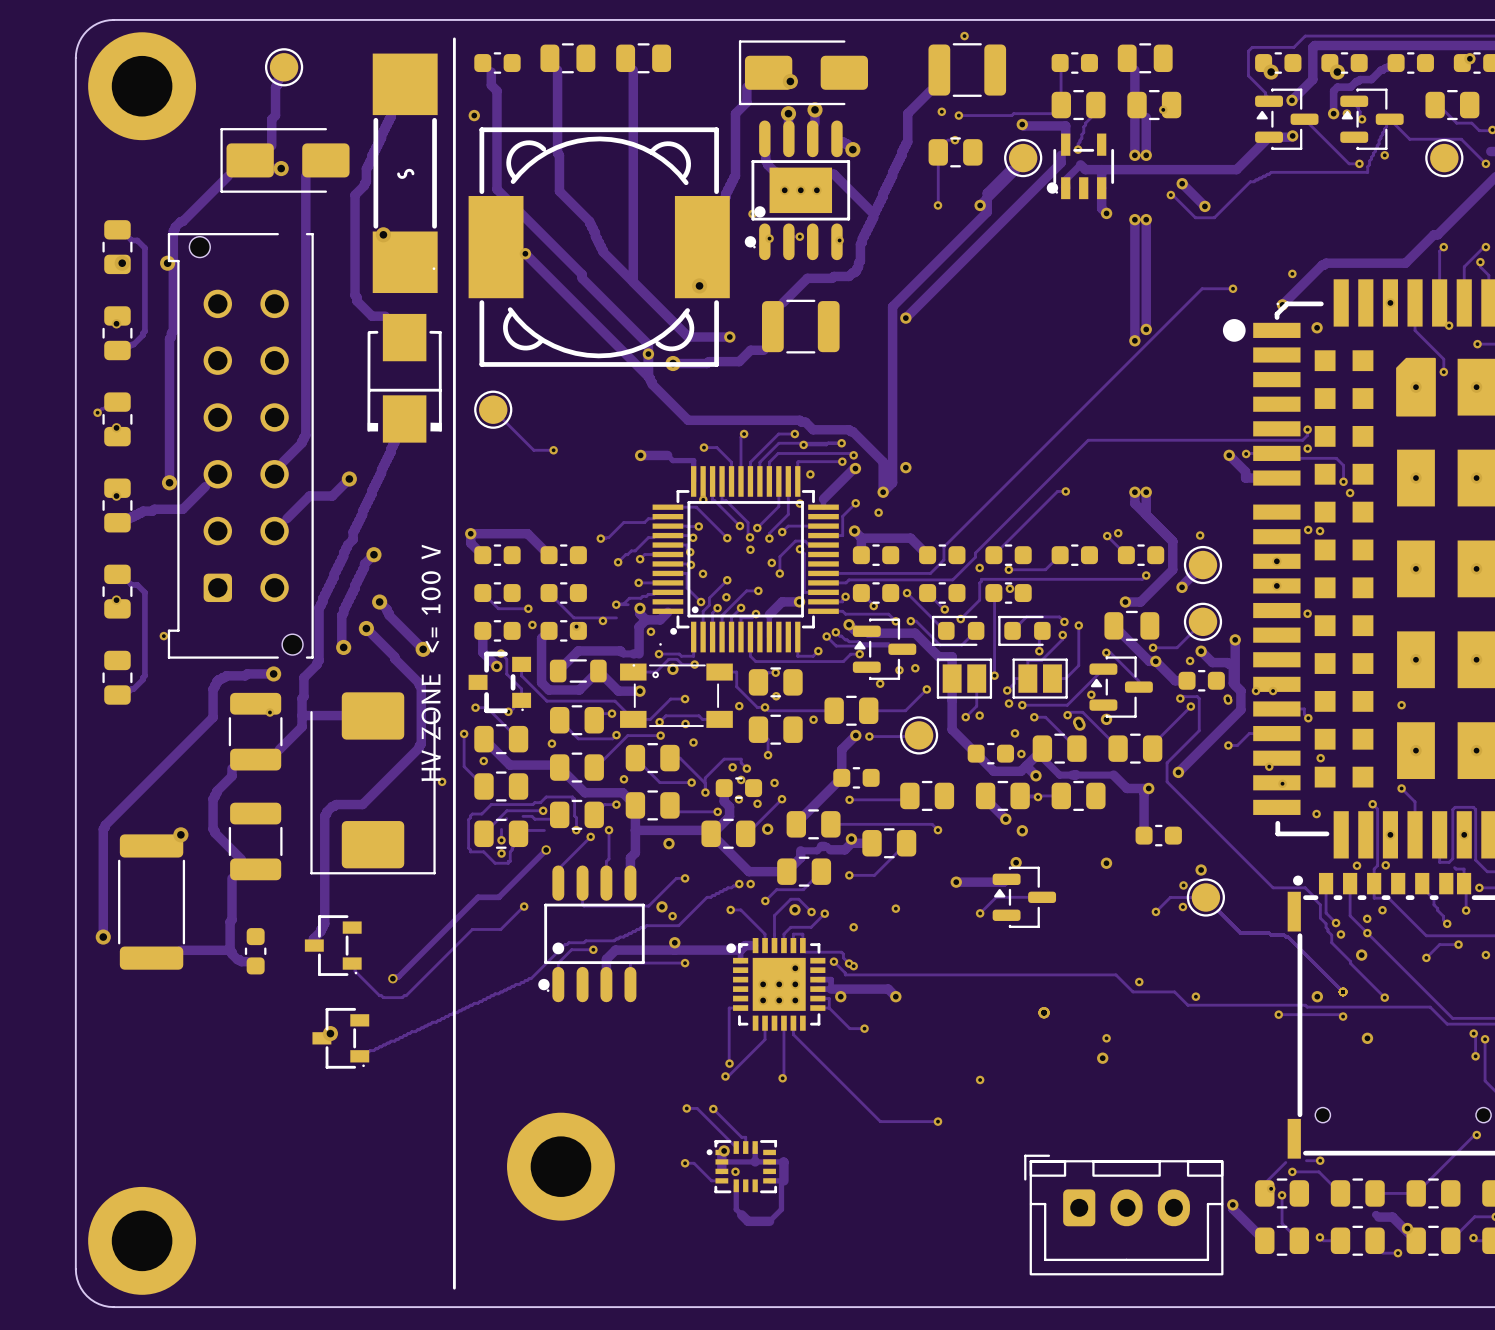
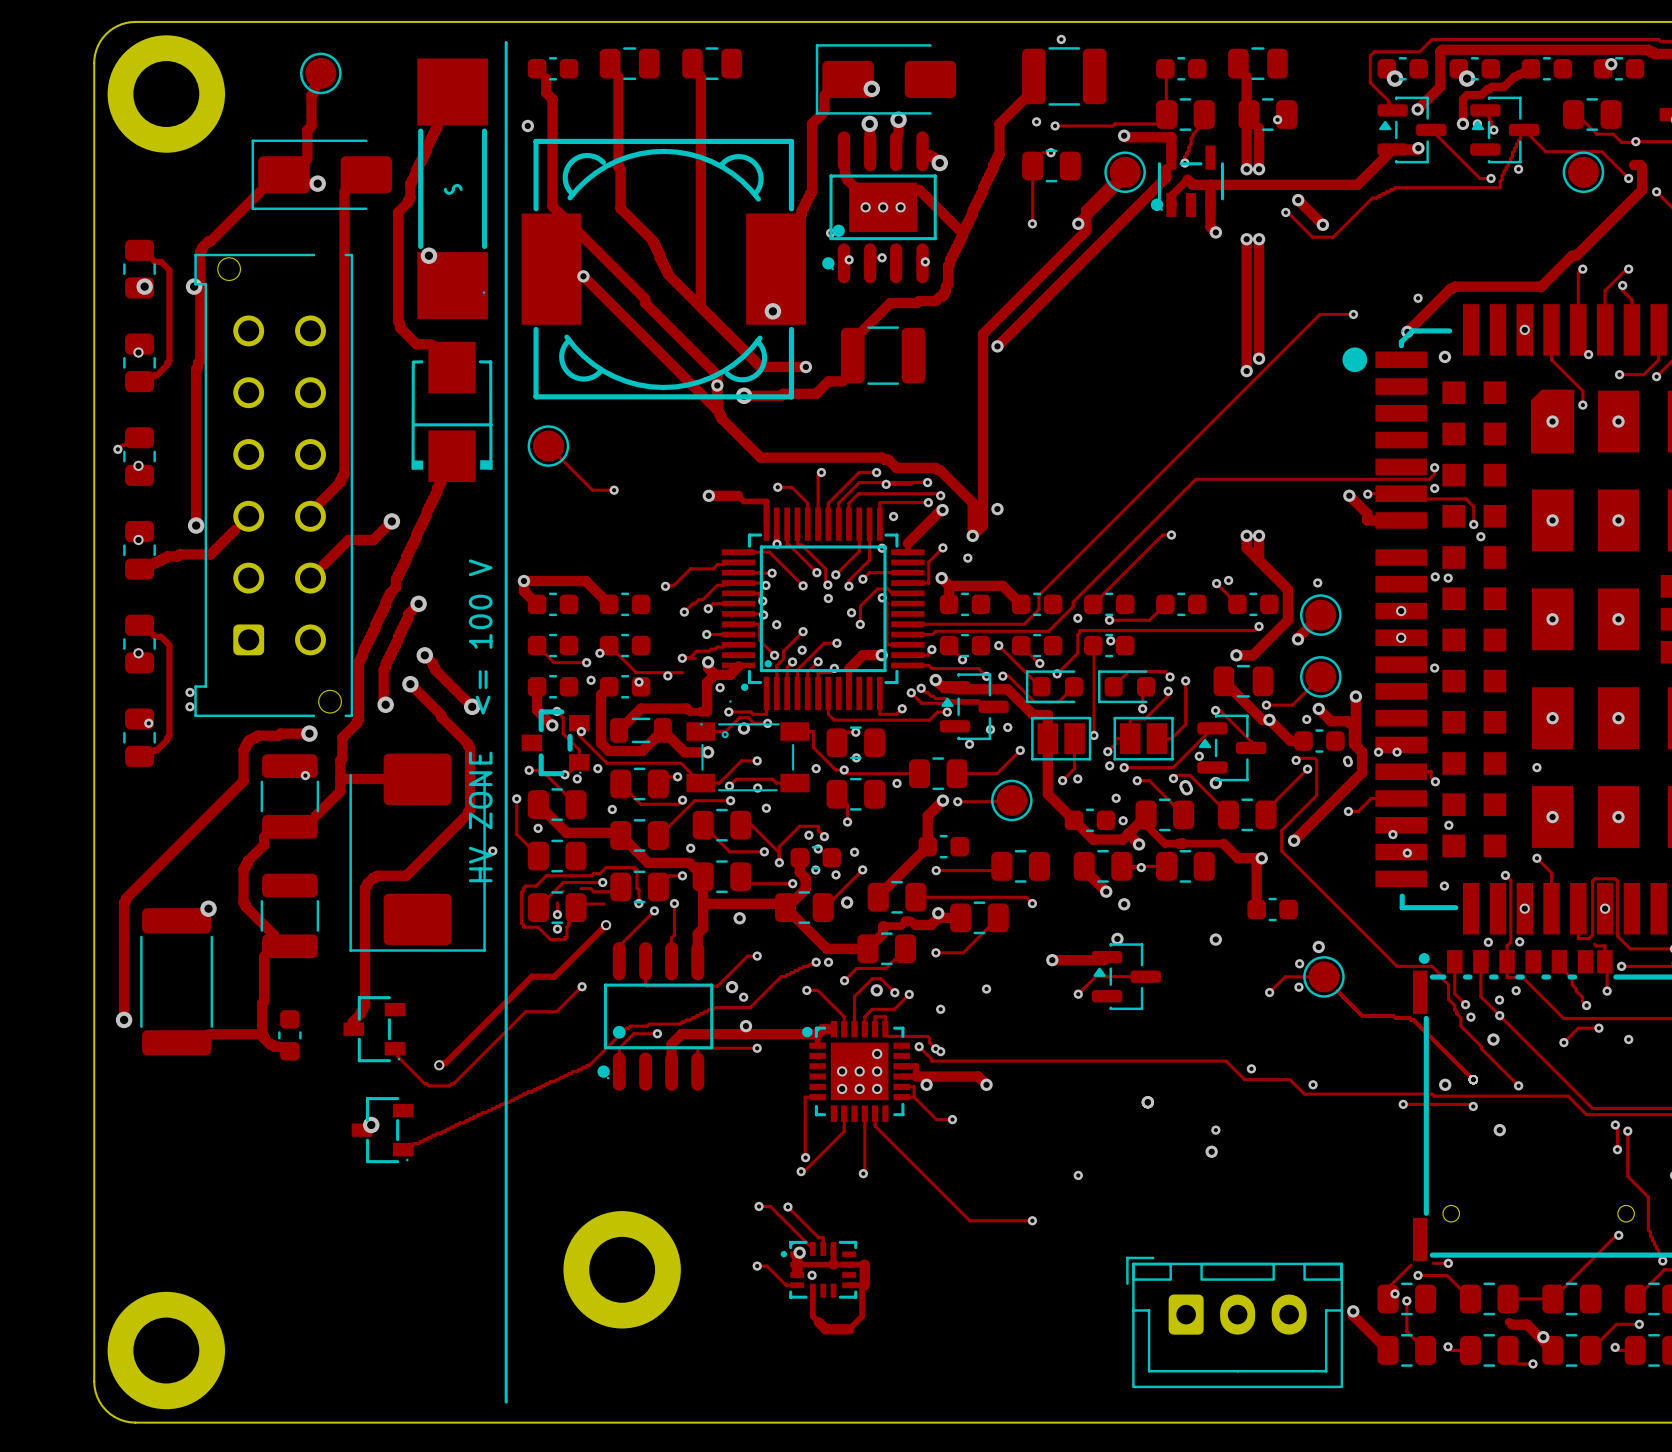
via: none -> (599, 653)
via: none -> (189, 706)
via: none -> (148, 723)
via: none -> (581, 731)
via: none -> (597, 768)
via: none -> (577, 778)

